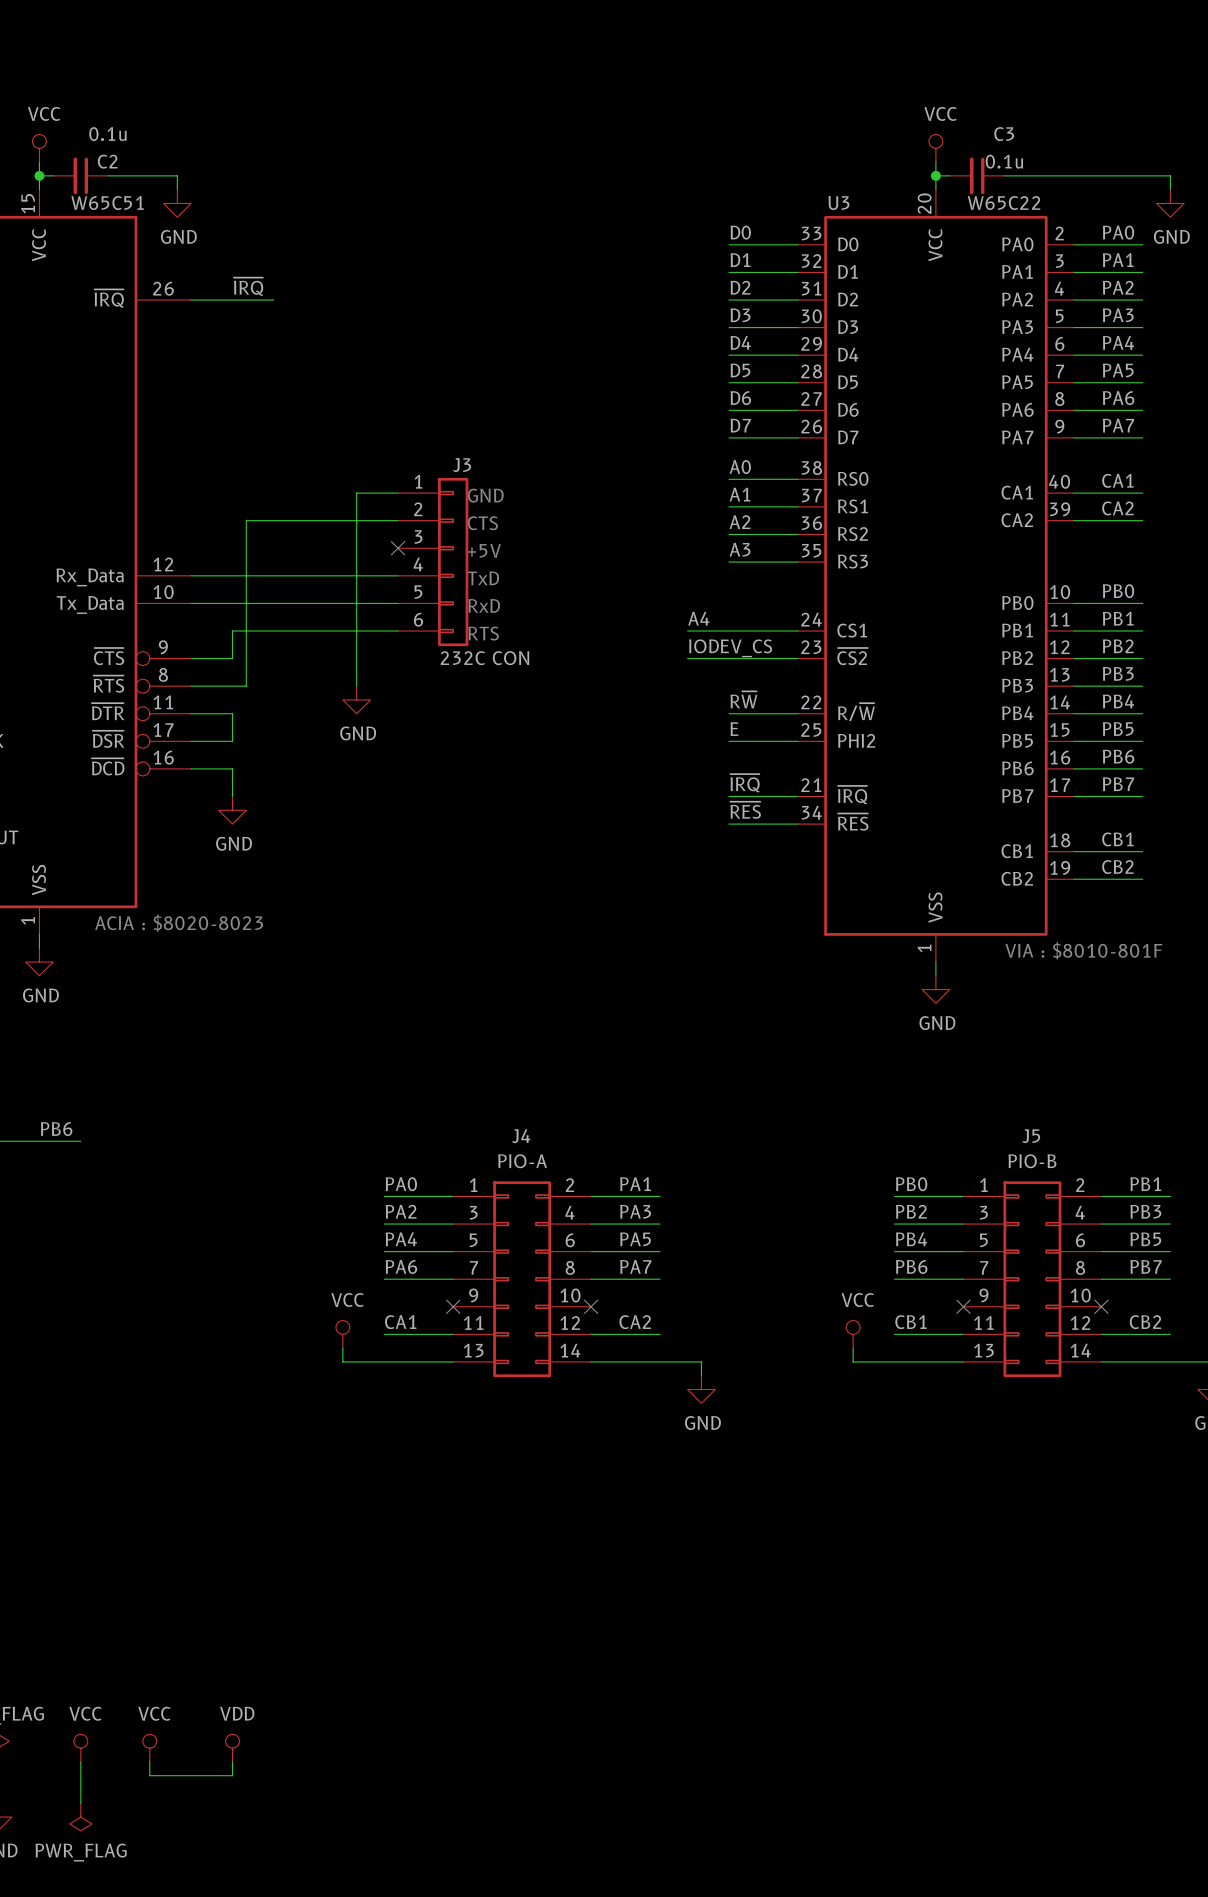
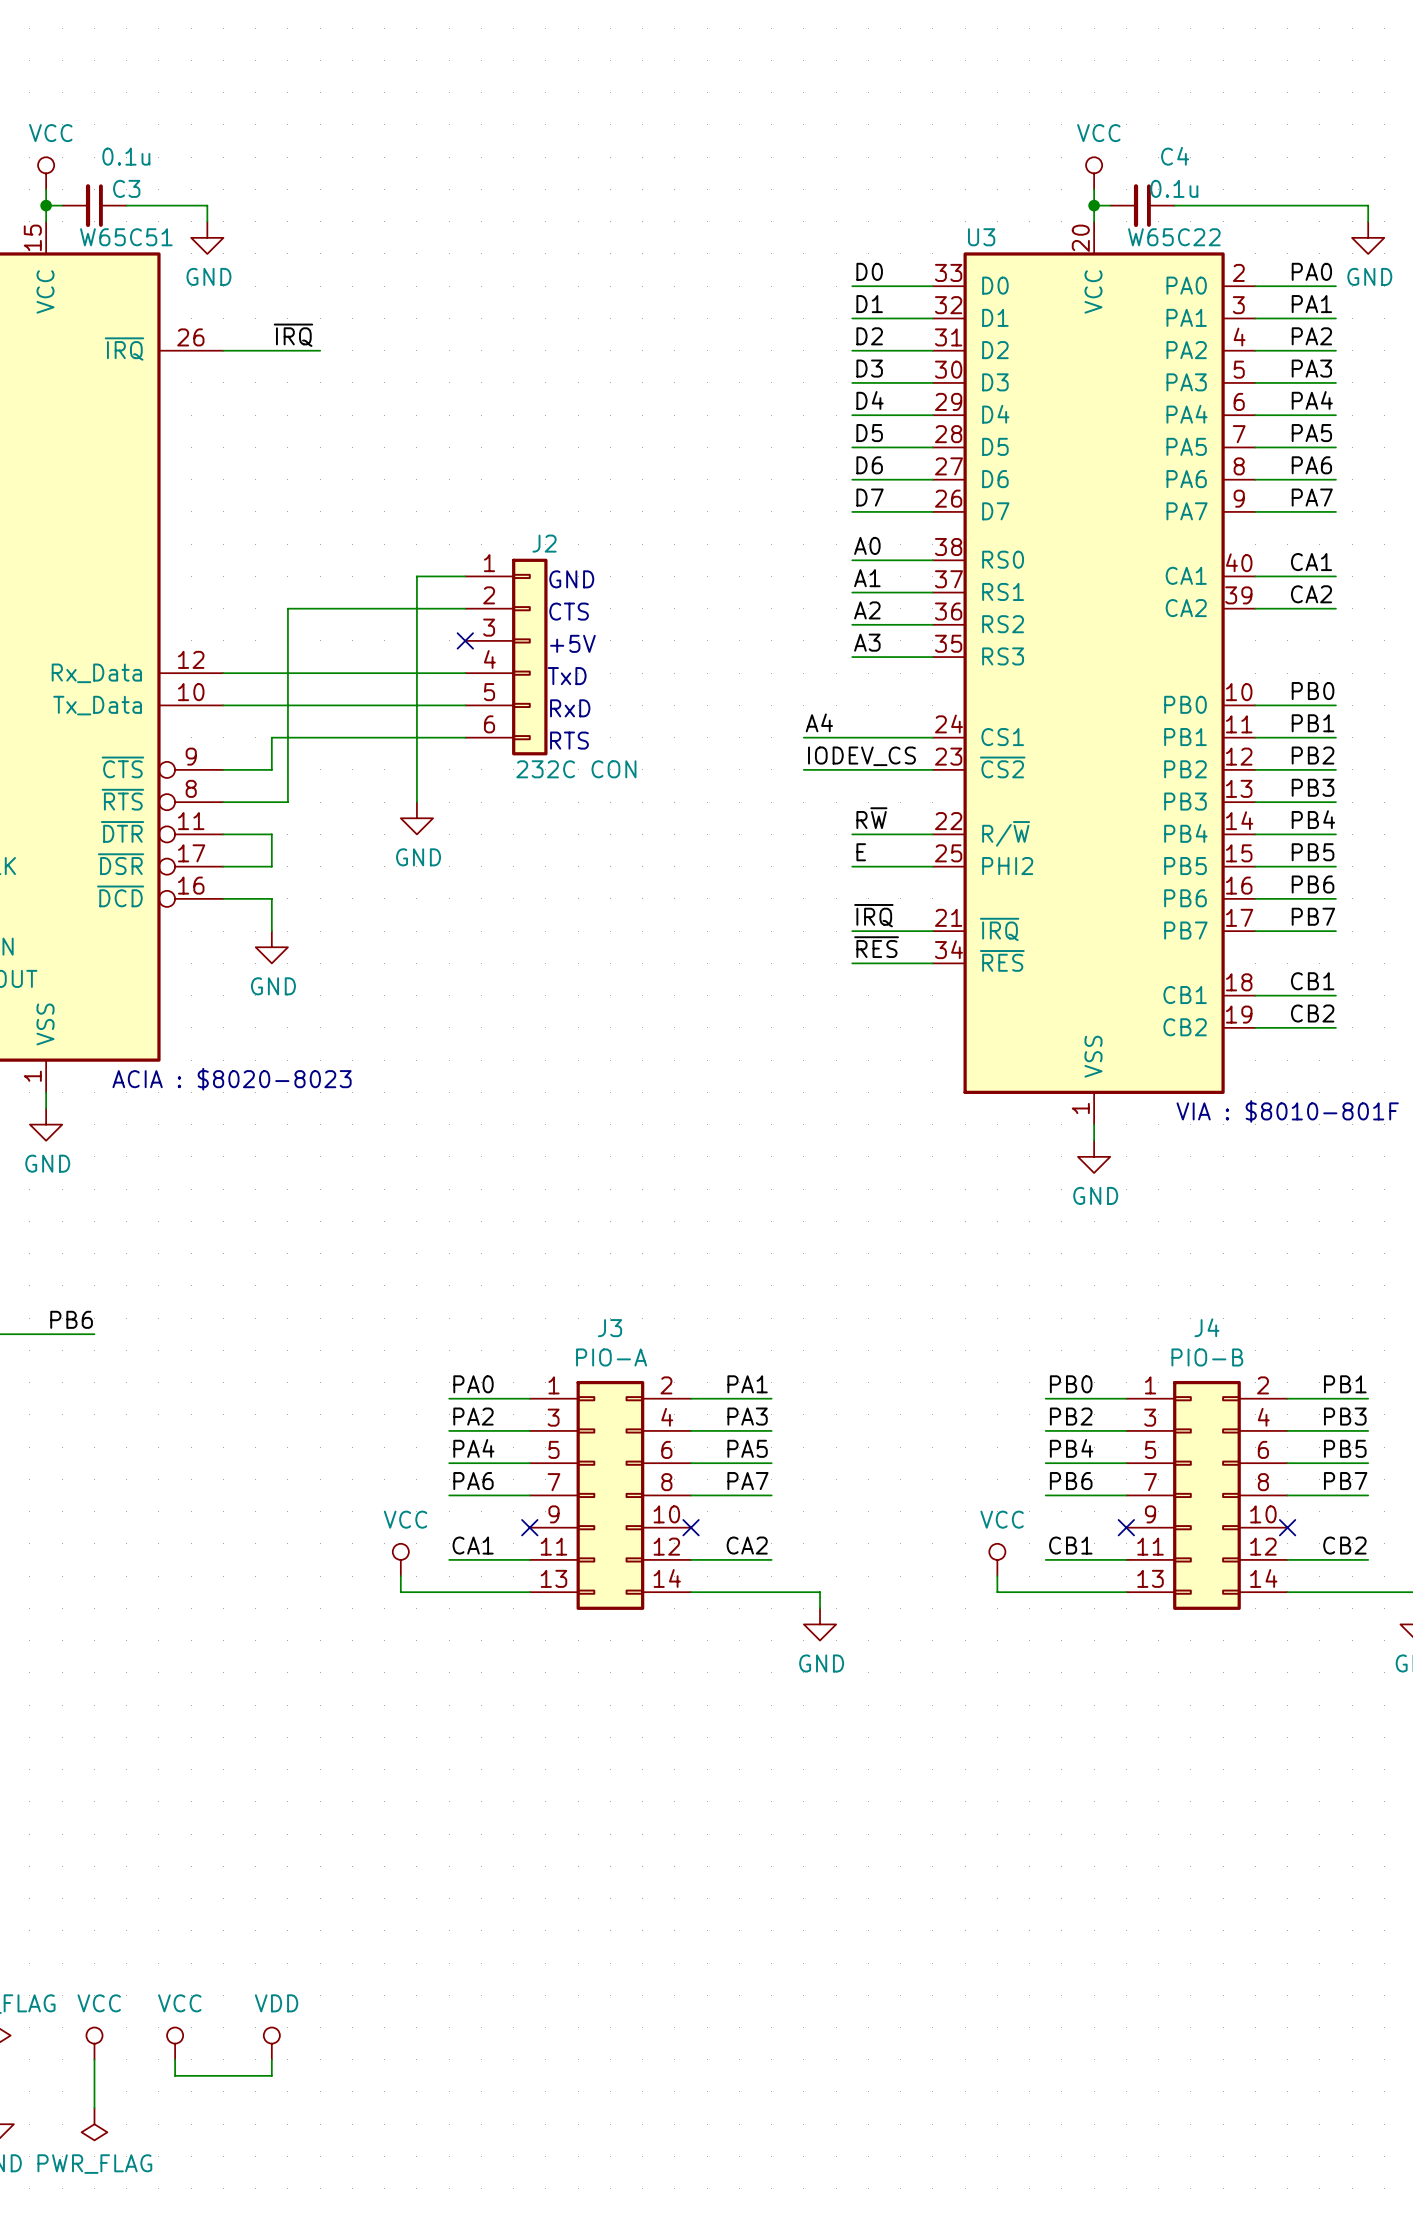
C3 name: C3 (1004, 134) -> C4 (1175, 156)
C2 name: C2 (107, 161) -> C3 (126, 188)
J3 name: J3 (462, 465) -> J2 (544, 543)
J4 name: J4 (521, 1136) -> J3 (610, 1328)
J5 name: J5 (1031, 1136) -> J4 (1206, 1327)

